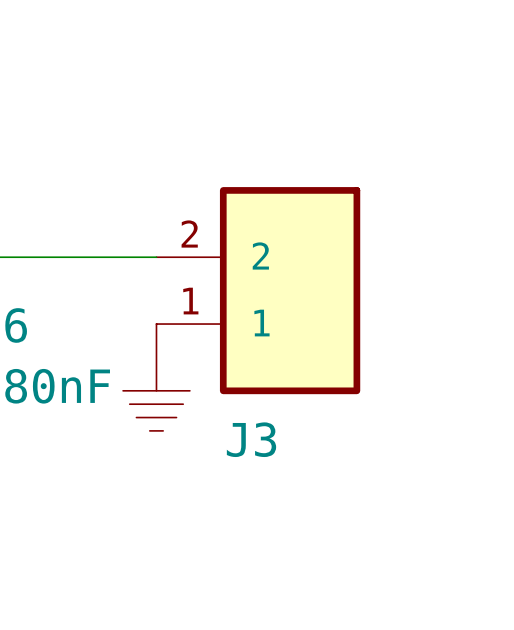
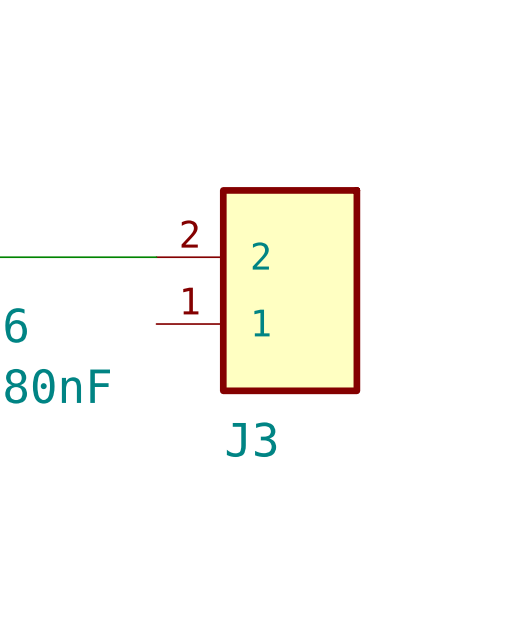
power symbol: (156, 377) -> none

